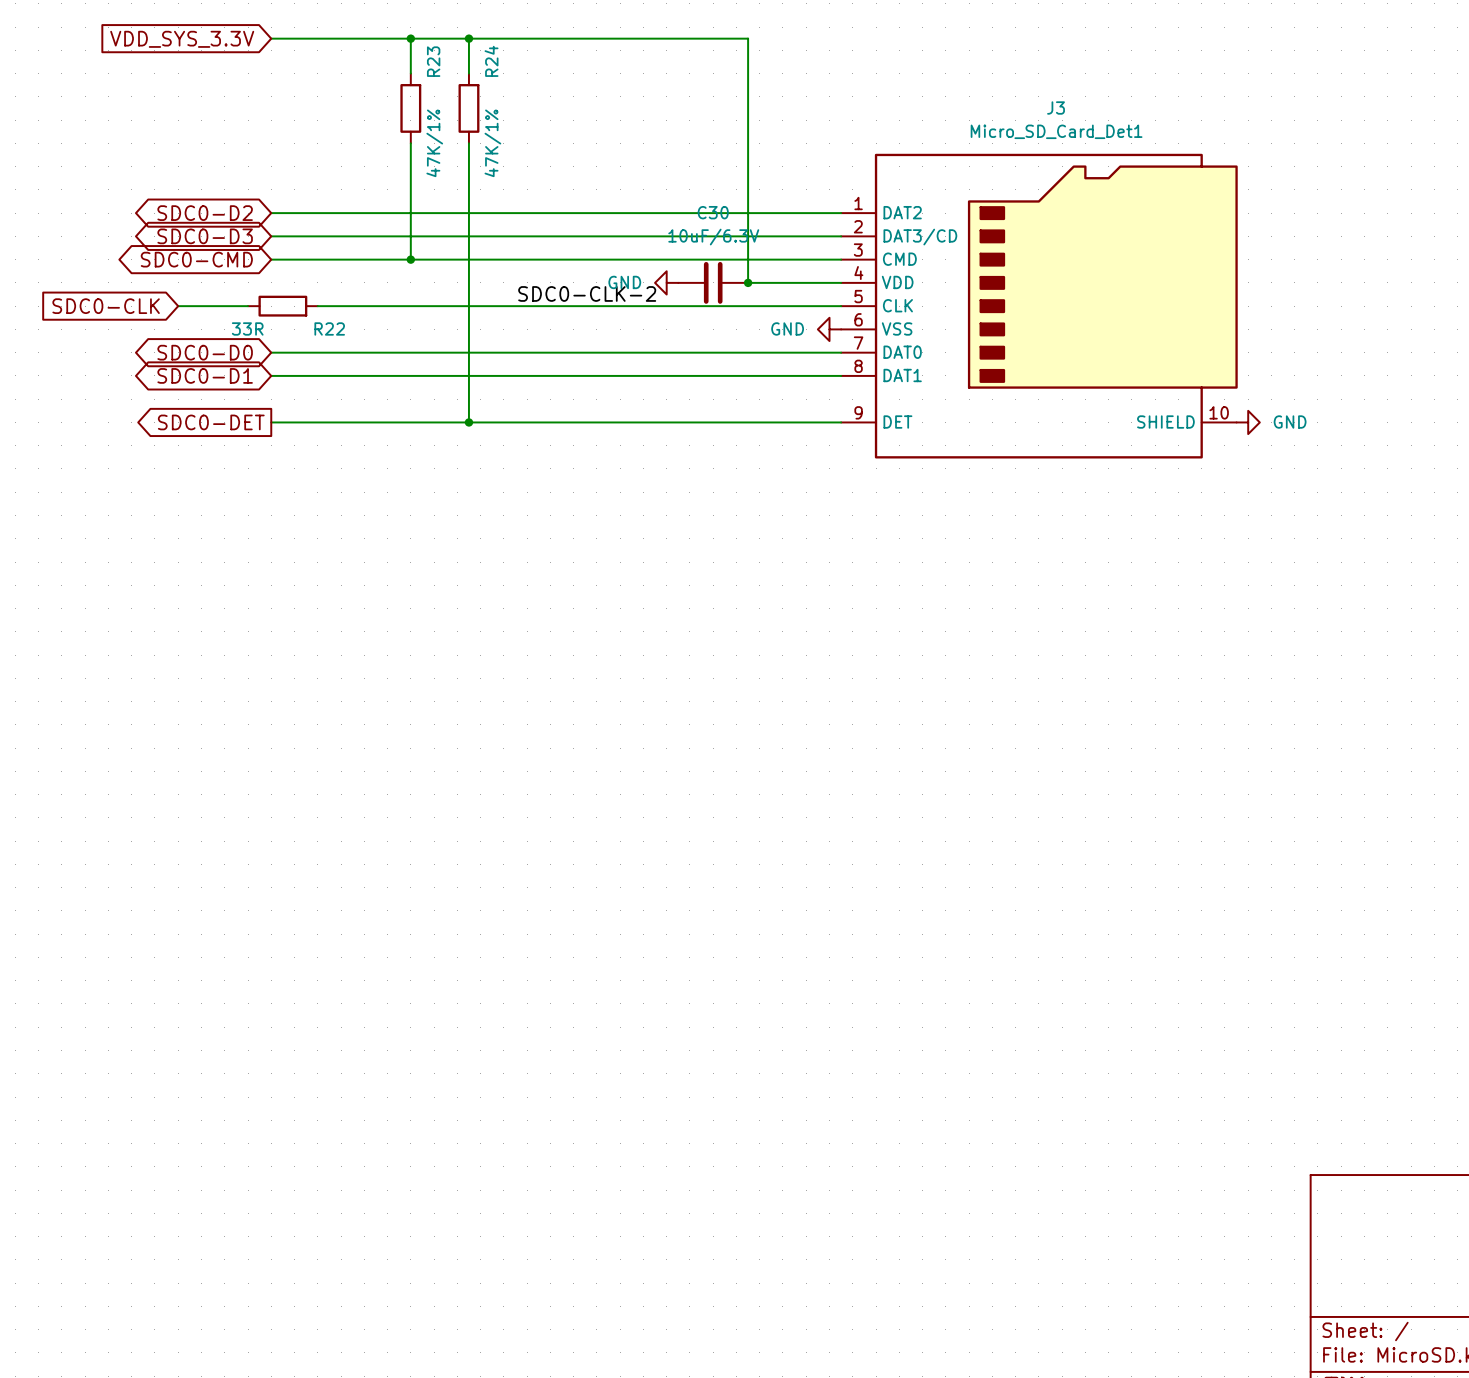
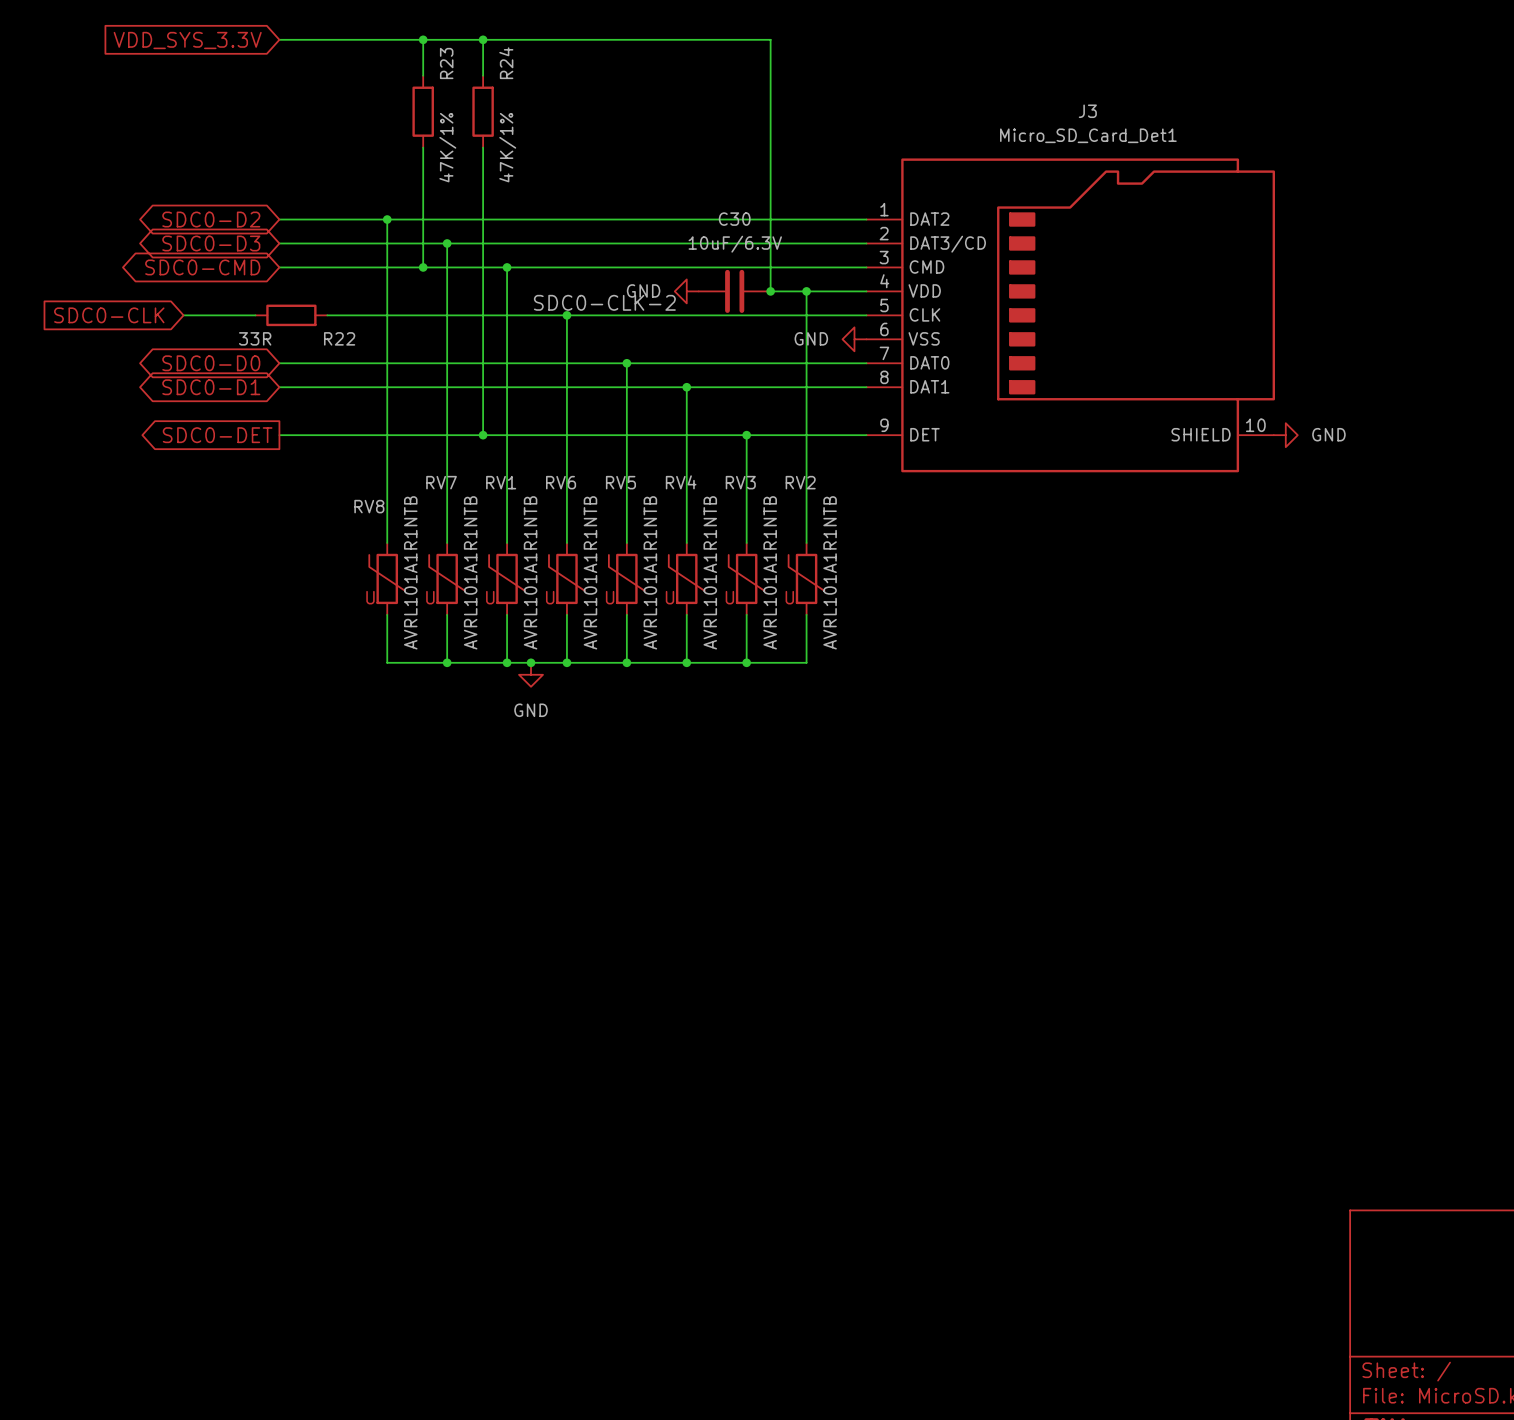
wire: none -> (387, 219) (387, 542)
junction: none -> (387, 219)
wire: none -> (447, 243) (447, 542)
junction: none -> (447, 243)
wire: none -> (507, 267) (507, 542)
junction: none -> (507, 267)
wire: none -> (806, 291) (806, 542)
junction: none -> (806, 291)
wire: none -> (566, 315) (566, 542)
junction: none -> (566, 315)
wire: none -> (626, 363) (626, 542)
junction: none -> (626, 363)
wire: none -> (686, 387) (686, 542)
junction: none -> (686, 387)
wire: none -> (746, 435) (746, 542)
junction: none -> (746, 435)
RV8: none -> AVRL101A1R1NTB (387, 578)
RV7: none -> AVRL101A1R1NTB (447, 578)
RV1: none -> AVRL101A1R1NTB (507, 578)
RV6: none -> AVRL101A1R1NTB (566, 578)
RV5: none -> AVRL101A1R1NTB (626, 578)
RV4: none -> AVRL101A1R1NTB (686, 578)
RV3: none -> AVRL101A1R1NTB (746, 578)
RV2: none -> AVRL101A1R1NTB (806, 578)
wire: none -> (387, 614) (387, 662) (806, 662) (806, 614)
wire: none -> (447, 614) (447, 662)
wire: none -> (507, 614) (507, 662)
wire: none -> (566, 614) (566, 662)
wire: none -> (626, 614) (626, 662)
wire: none -> (686, 614) (686, 662)
wire: none -> (746, 614) (746, 662)
junction: none -> (447, 662)
junction: none -> (507, 662)
junction: none -> (531, 662)
junction: none -> (566, 662)
junction: none -> (626, 662)
junction: none -> (686, 662)
junction: none -> (746, 662)
power symbol: none -> GND (531, 674)

